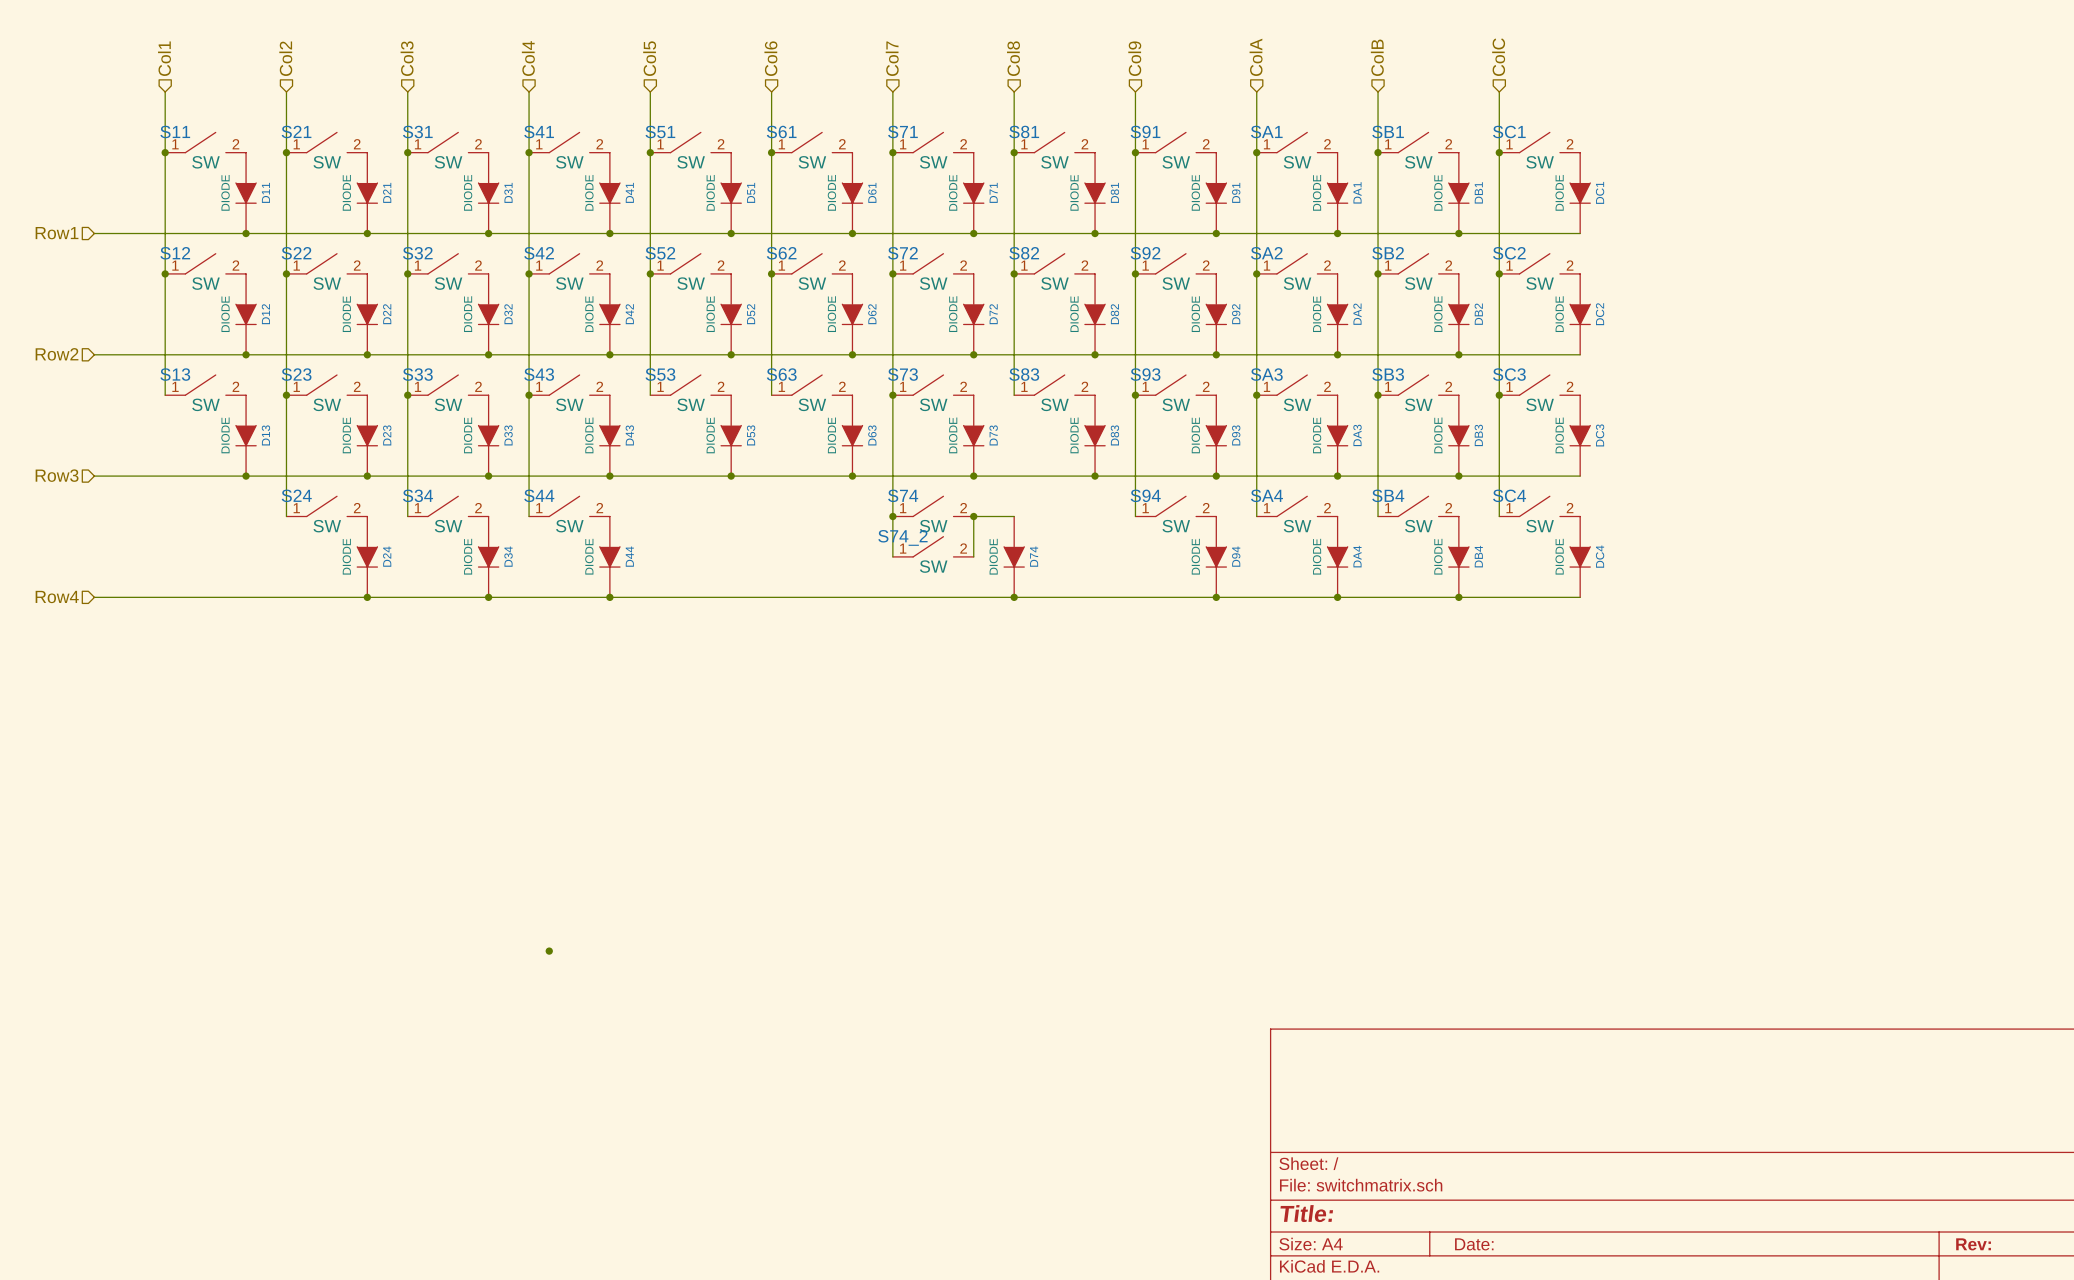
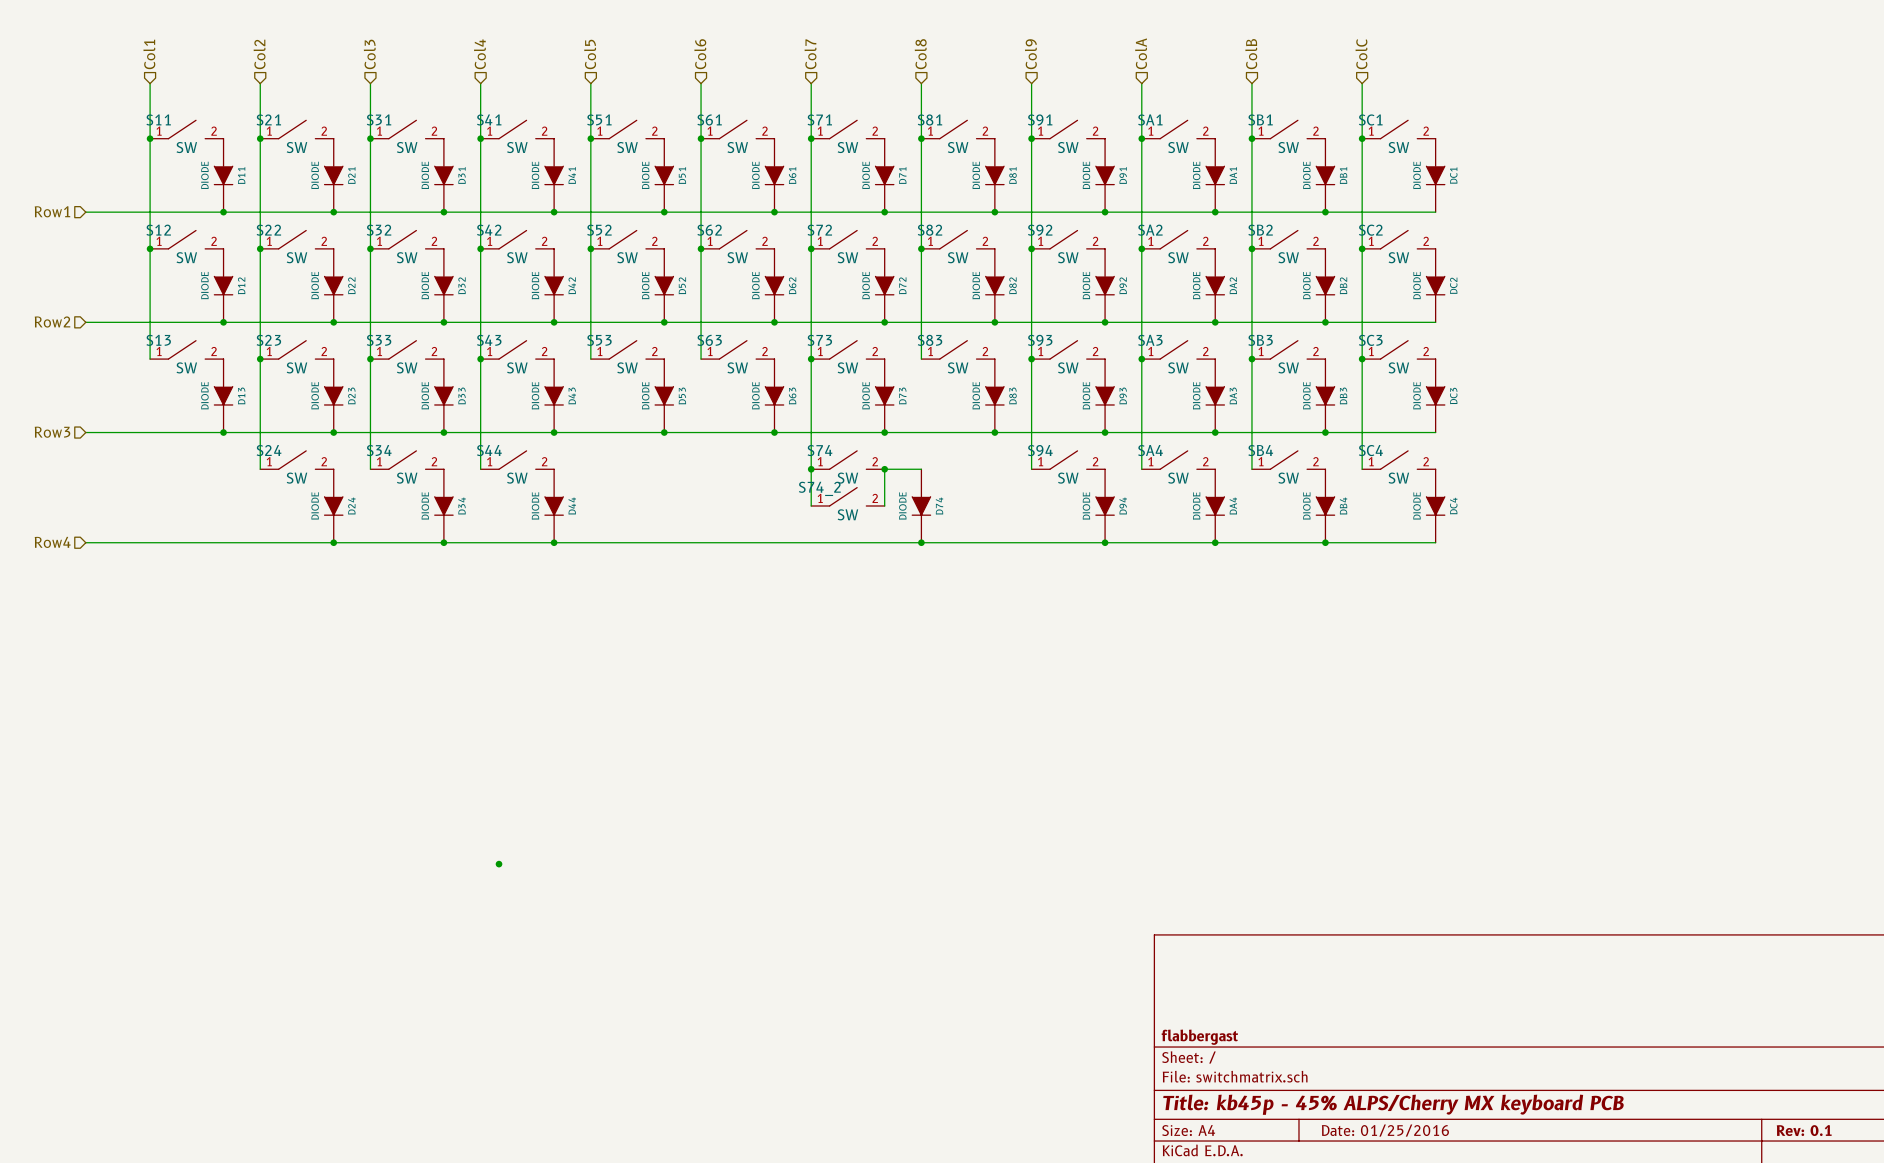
title block: none -> flabbergast (1199, 1037)
title block: Title: (1306, 1213) -> Title: kb45p - 45% ALPS/Cherry MX keyboard PCB (1393, 1104)
title block: Date: (1474, 1244) -> Date: 01/25/2016 (1385, 1130)
title block: Rev: (1973, 1244) -> Rev: 0.1 (1804, 1130)

